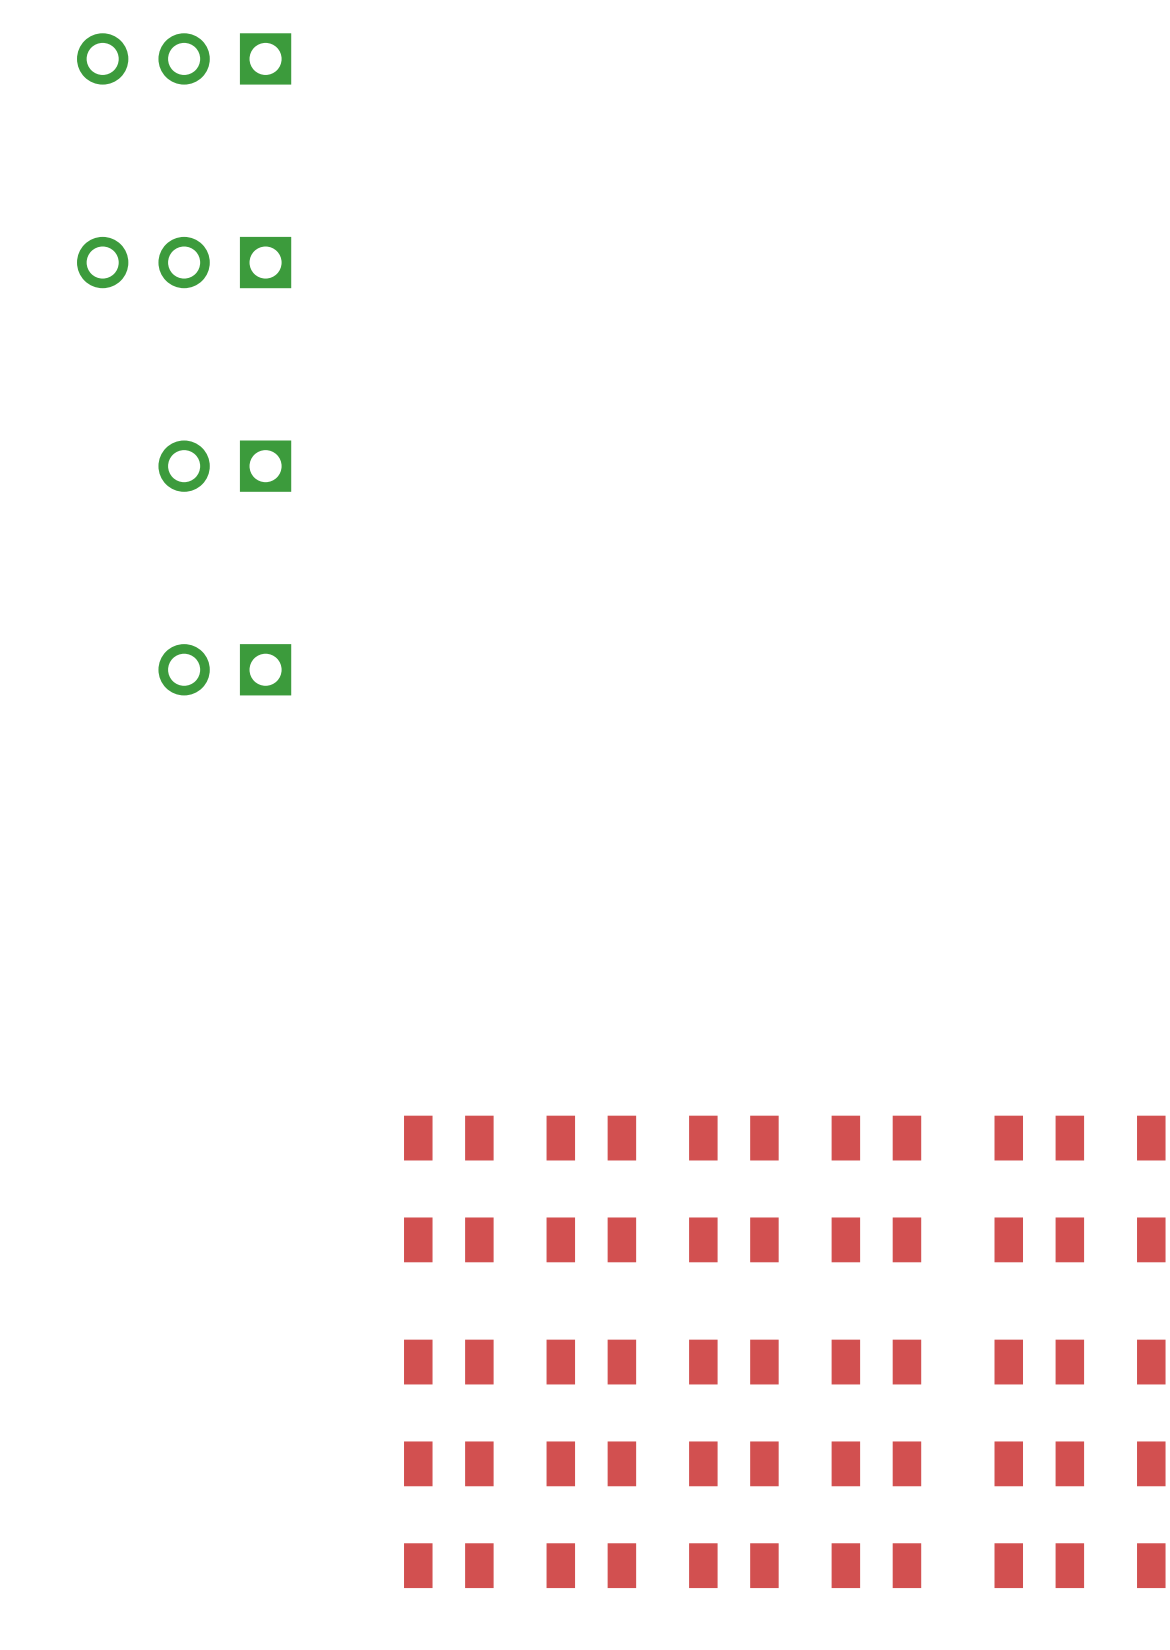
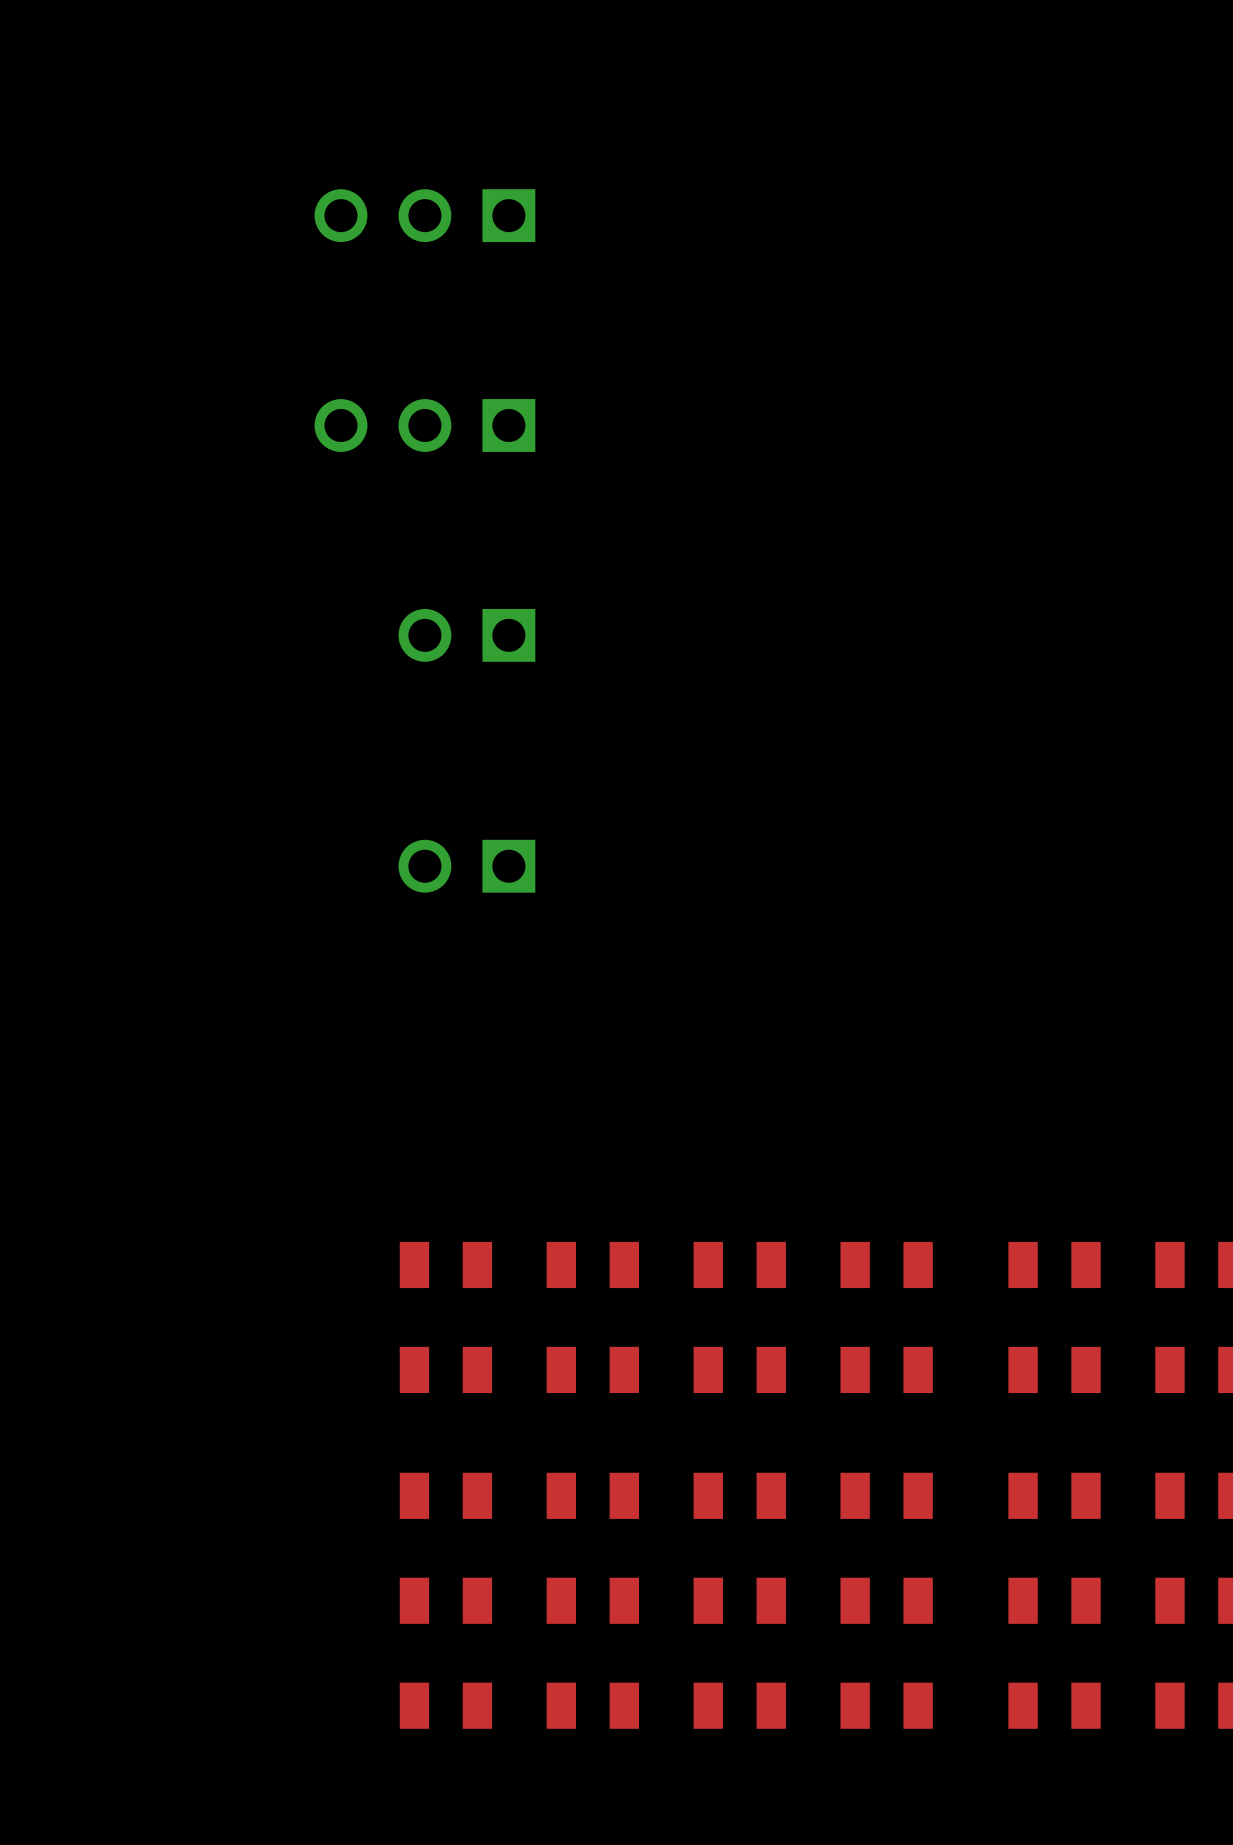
part: (184, 58) -> none
part: none -> (424, 215)
part: (184, 262) -> none
part: none -> (424, 425)
part: (224, 466) -> none
part: none -> (466, 635)
part: (224, 669) -> none
part: none -> (466, 866)

